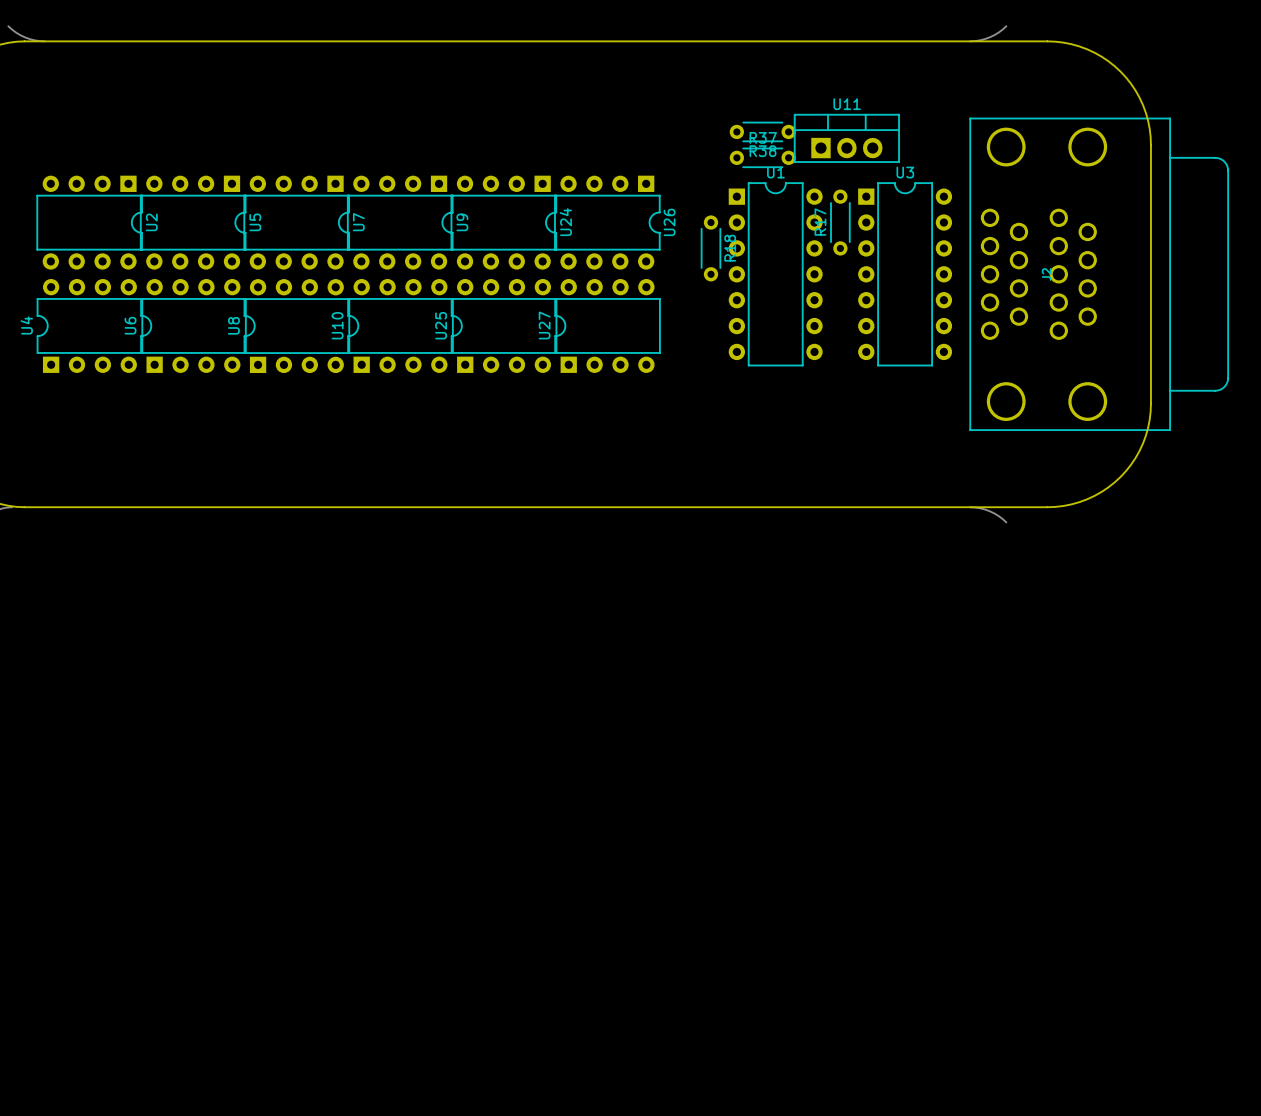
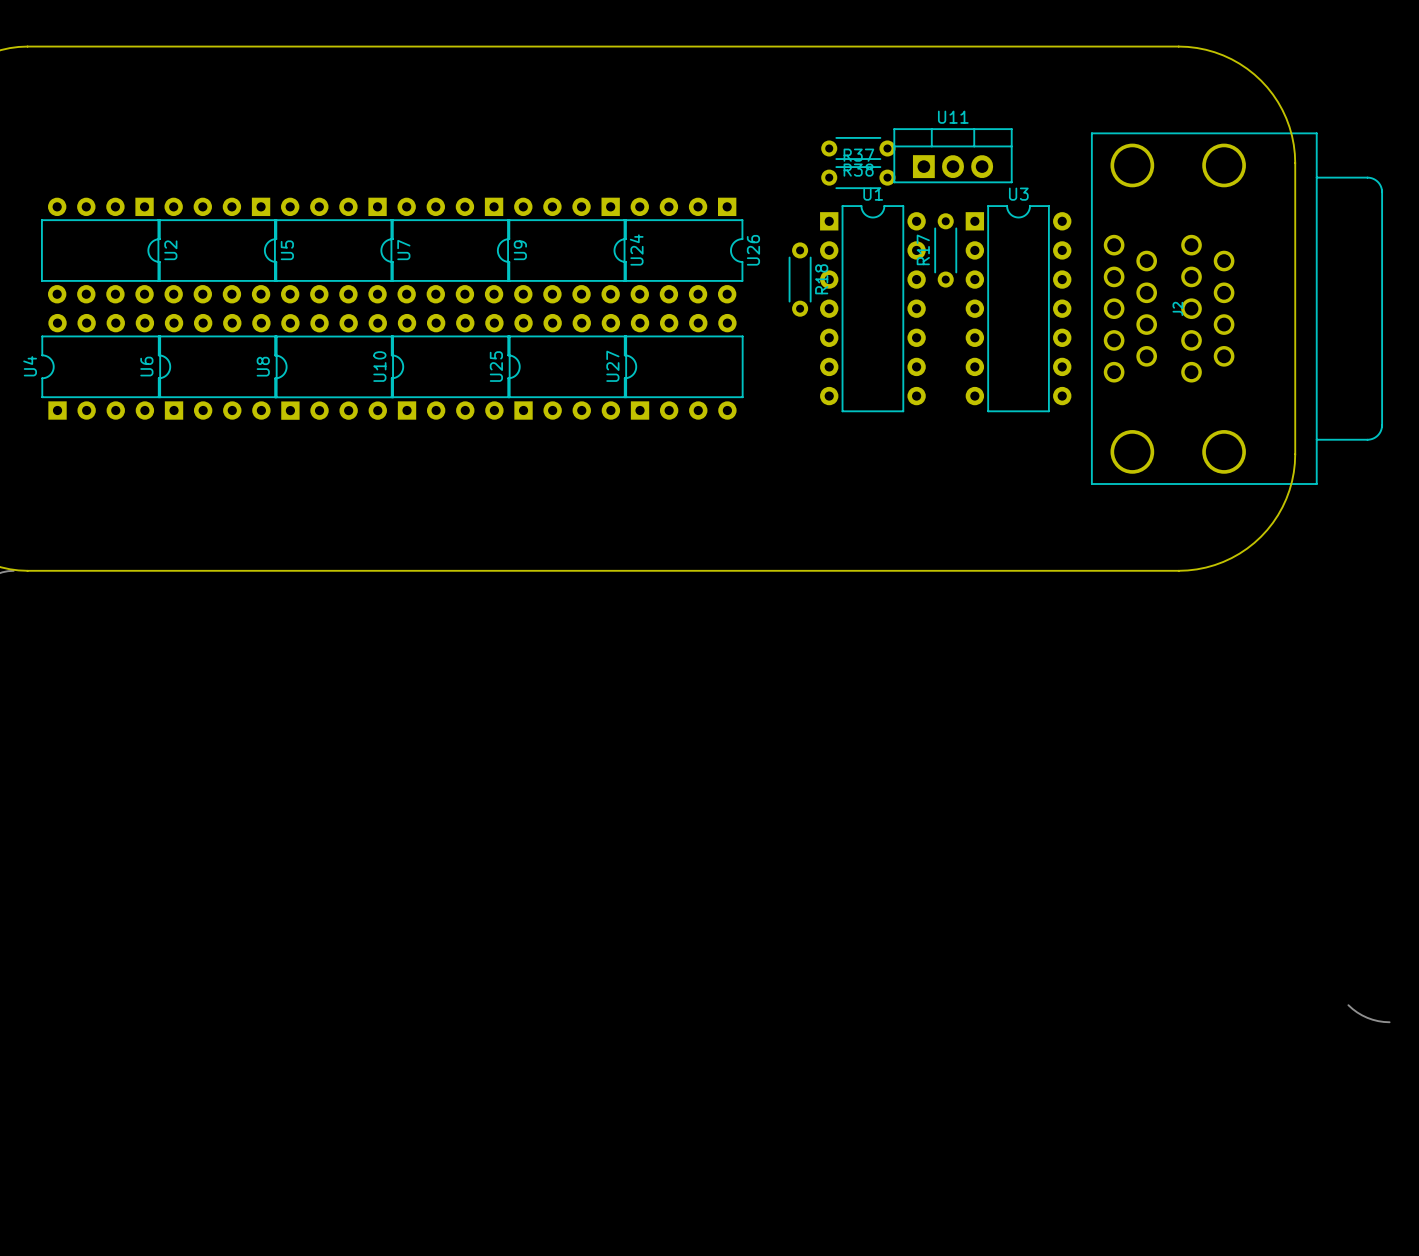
line: (8, 26) (25, 37) (44, 41) -> none
line: (1006, 26) (989, 37) (969, 41) -> none
line: (969, 507) (989, 511) (1006, 522) -> none
line: none -> (1348, 1005) (1367, 1017) (1389, 1022)

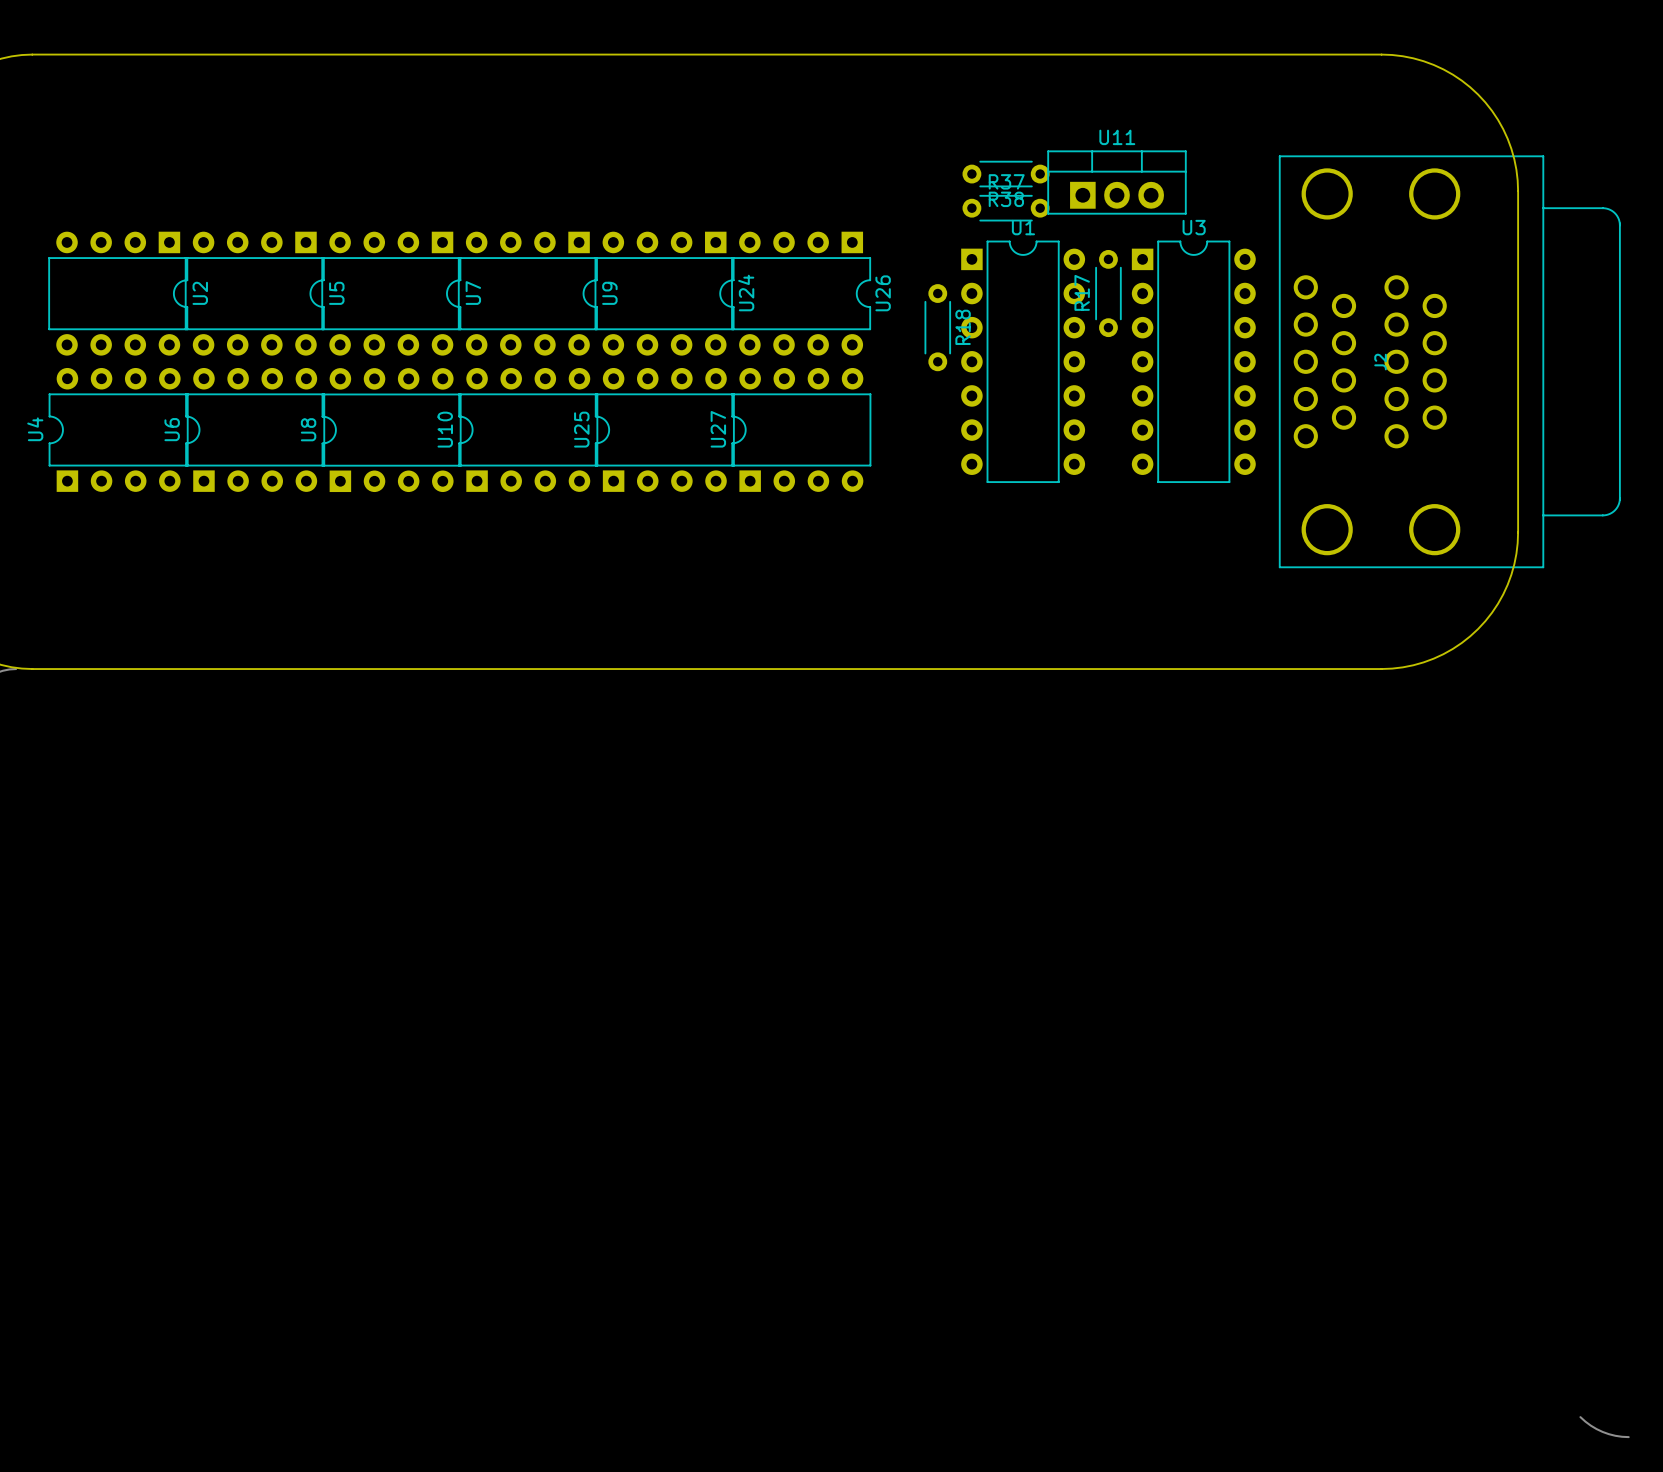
line: (1348, 1005) (1367, 1017) (1389, 1022) -> (1580, 1417) (1602, 1431) (1628, 1437)

